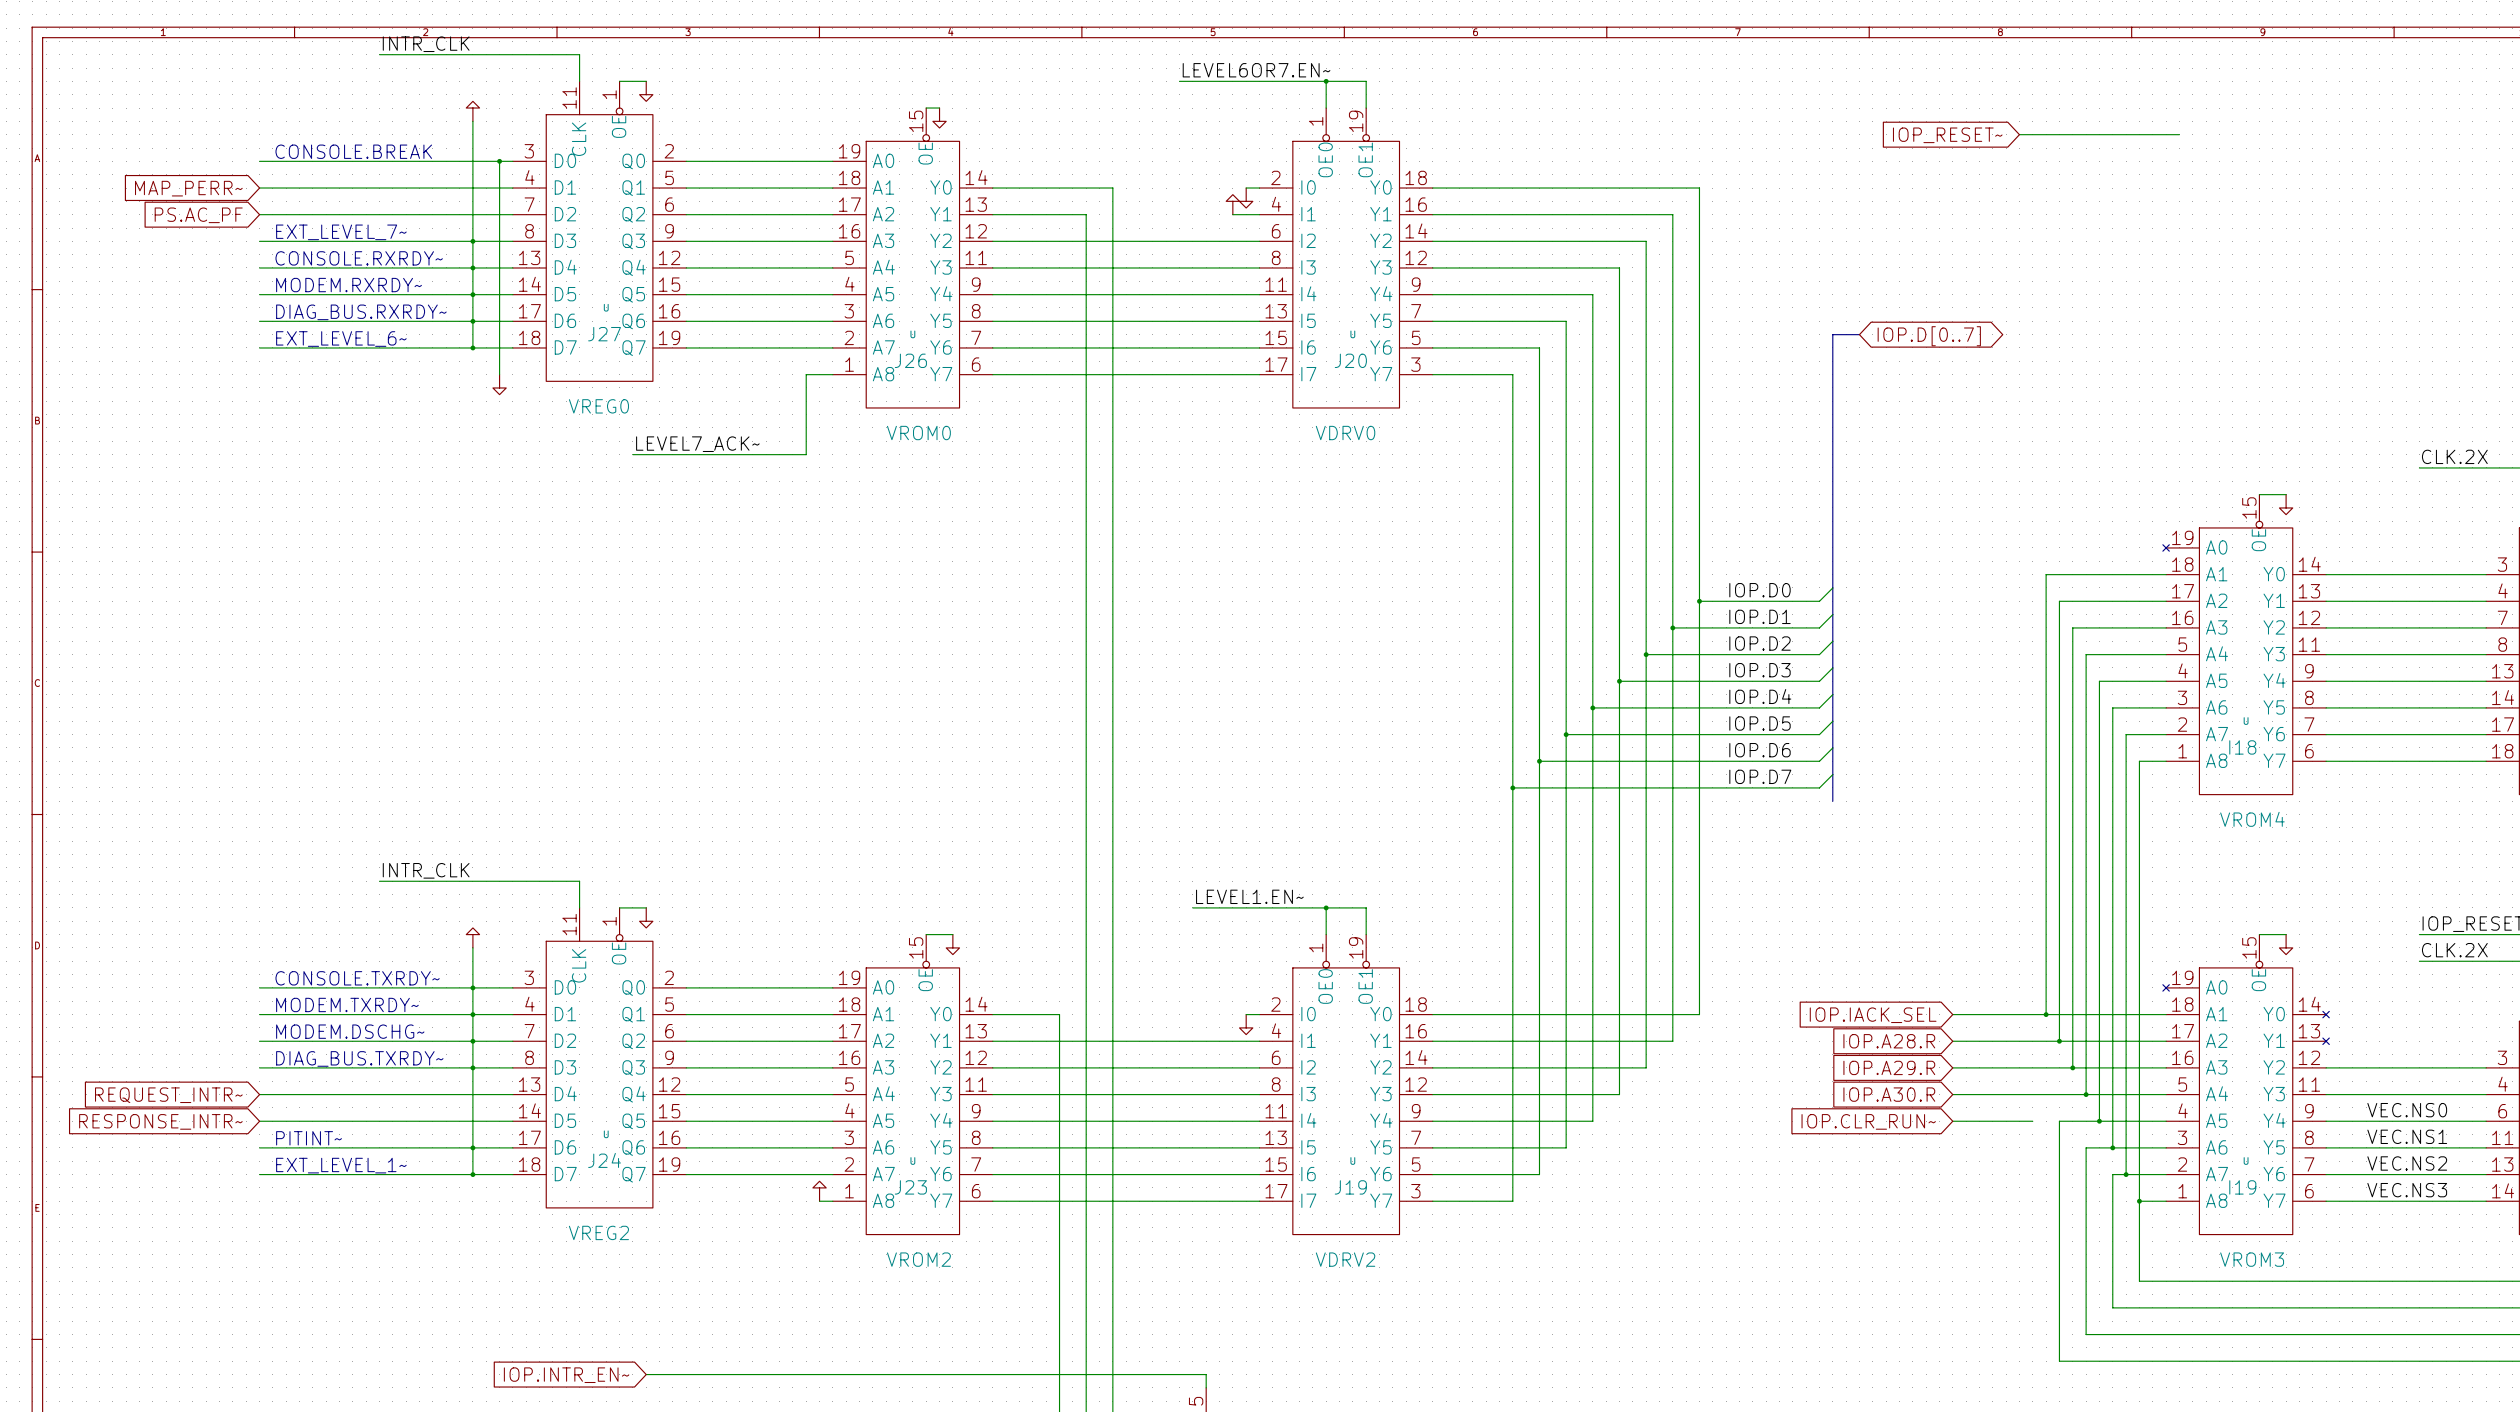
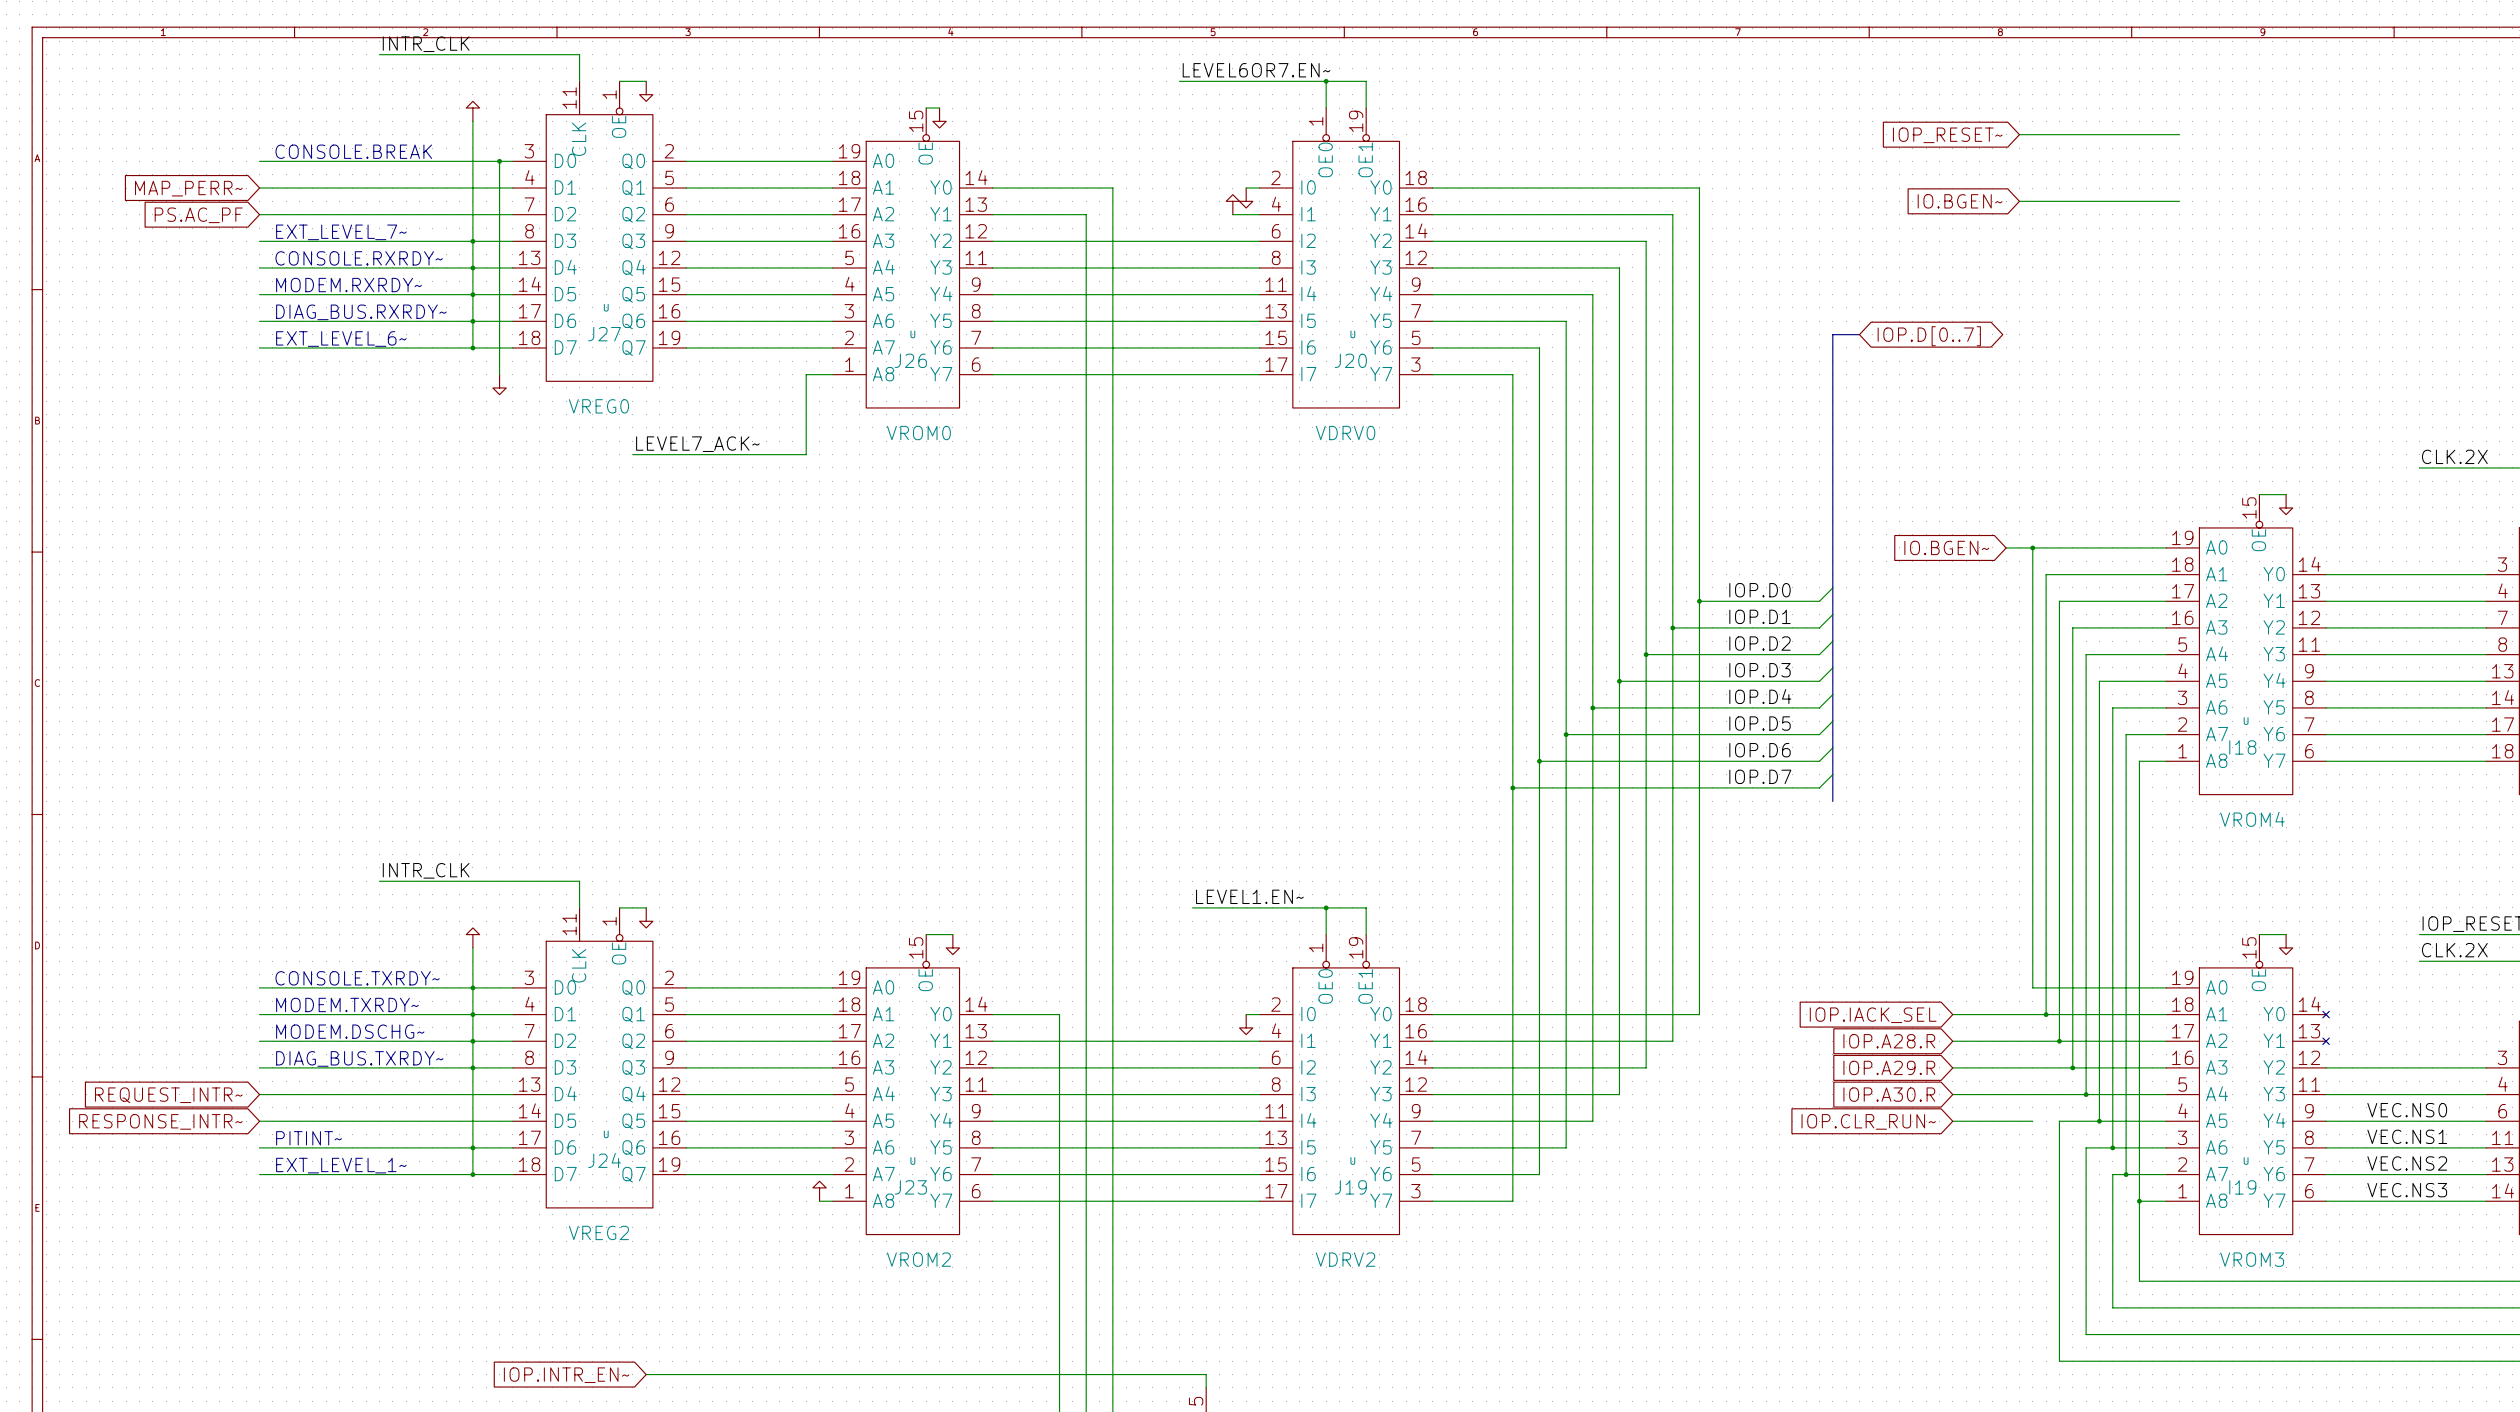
global label: none -> IO.BGEN~ (1960, 201)
wire: none -> (2019, 201) (2179, 201)
global label: none -> IO.BGEN~ (1946, 547)
wire: none -> (2006, 547) (2166, 547)
wire: none -> (2032, 547) (2032, 987) (2166, 987)
junction: none -> (2032, 547)
no-connect mark: (2166, 547) -> none
no-connect mark: (2166, 987) -> none

